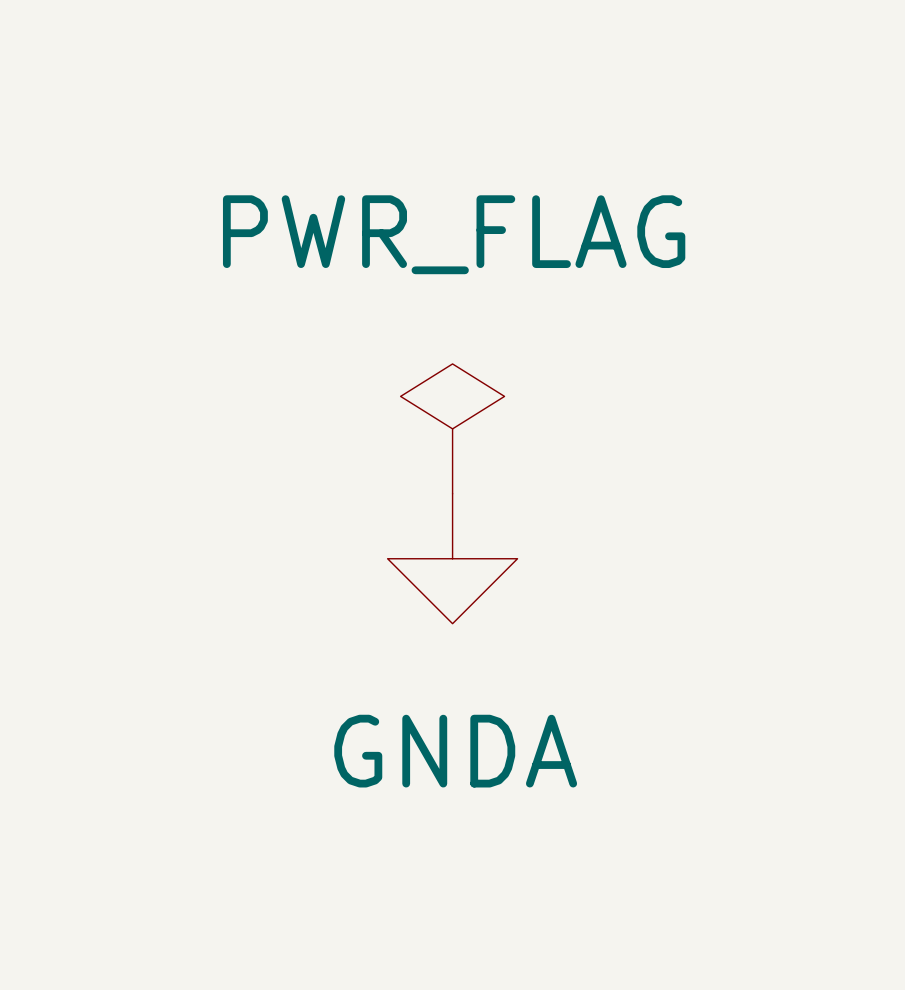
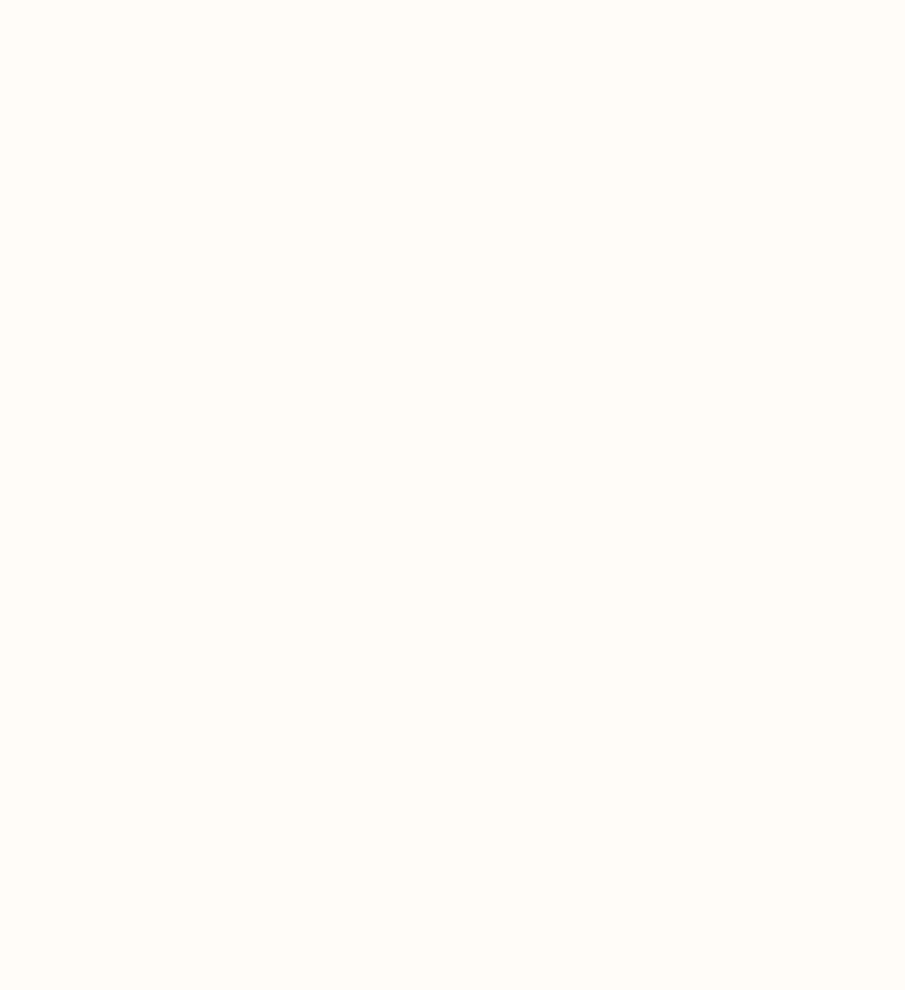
power symbol: PWR_FLAG (452, 428) -> none
power symbol: GNDA (452, 558) -> none

